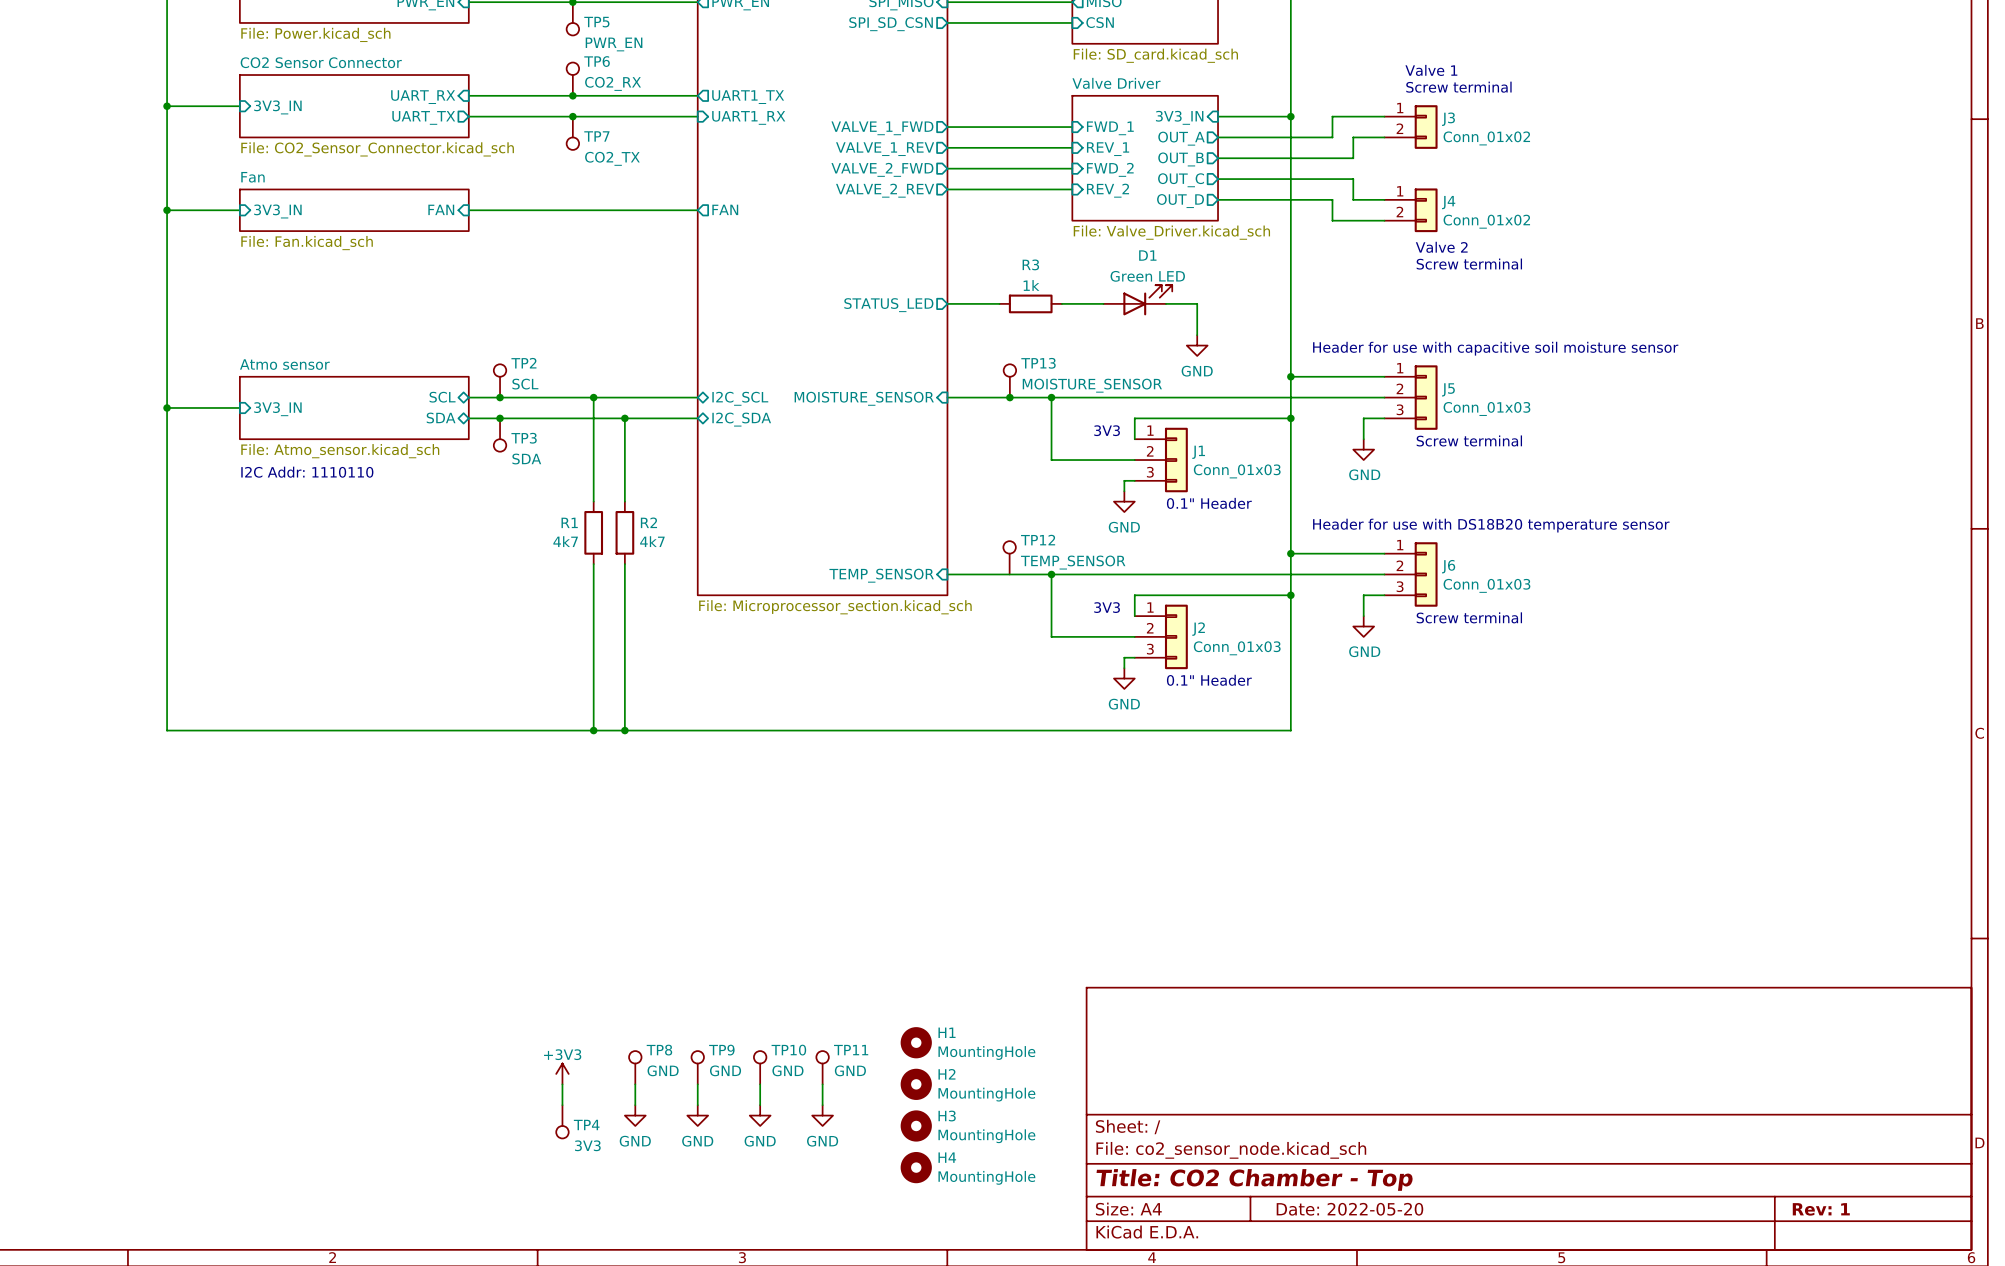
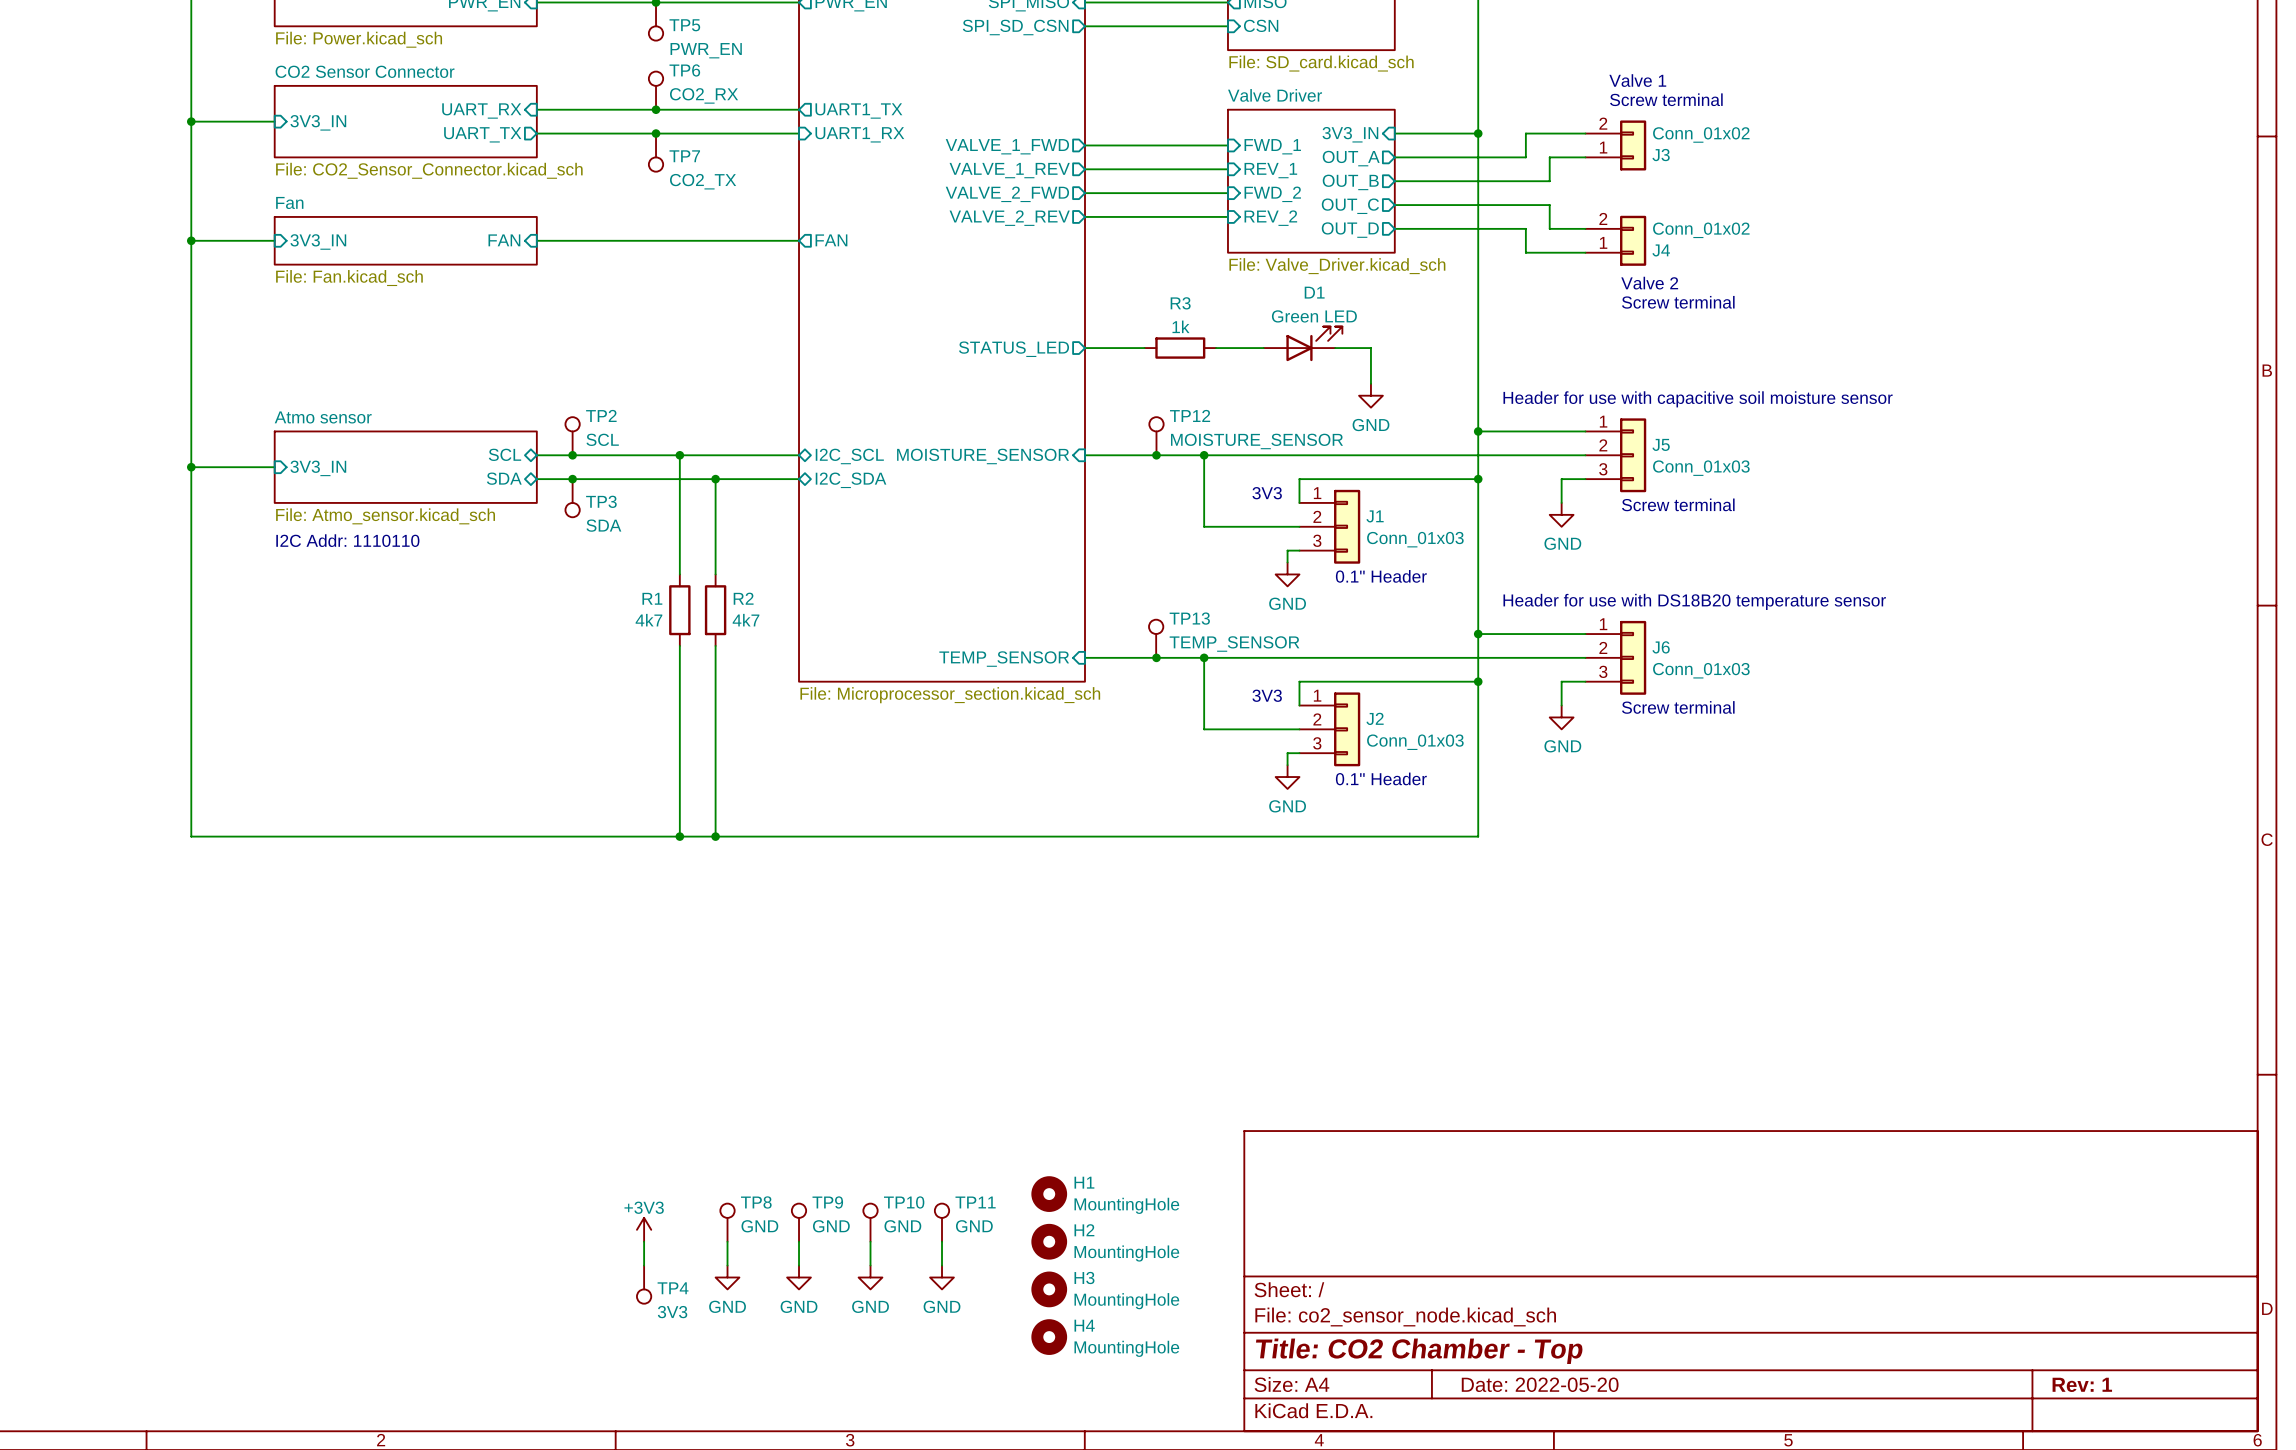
J3 flip: as is (1426, 127) -> up-down (1633, 145)
J4 flip: as is (1426, 210) -> up-down (1633, 240)
TP13 name: TP13 (1038, 363) -> TP12 (1190, 415)
TP12 name: TP12 (1038, 540) -> TP13 (1189, 618)
junction: none -> (1156, 657)

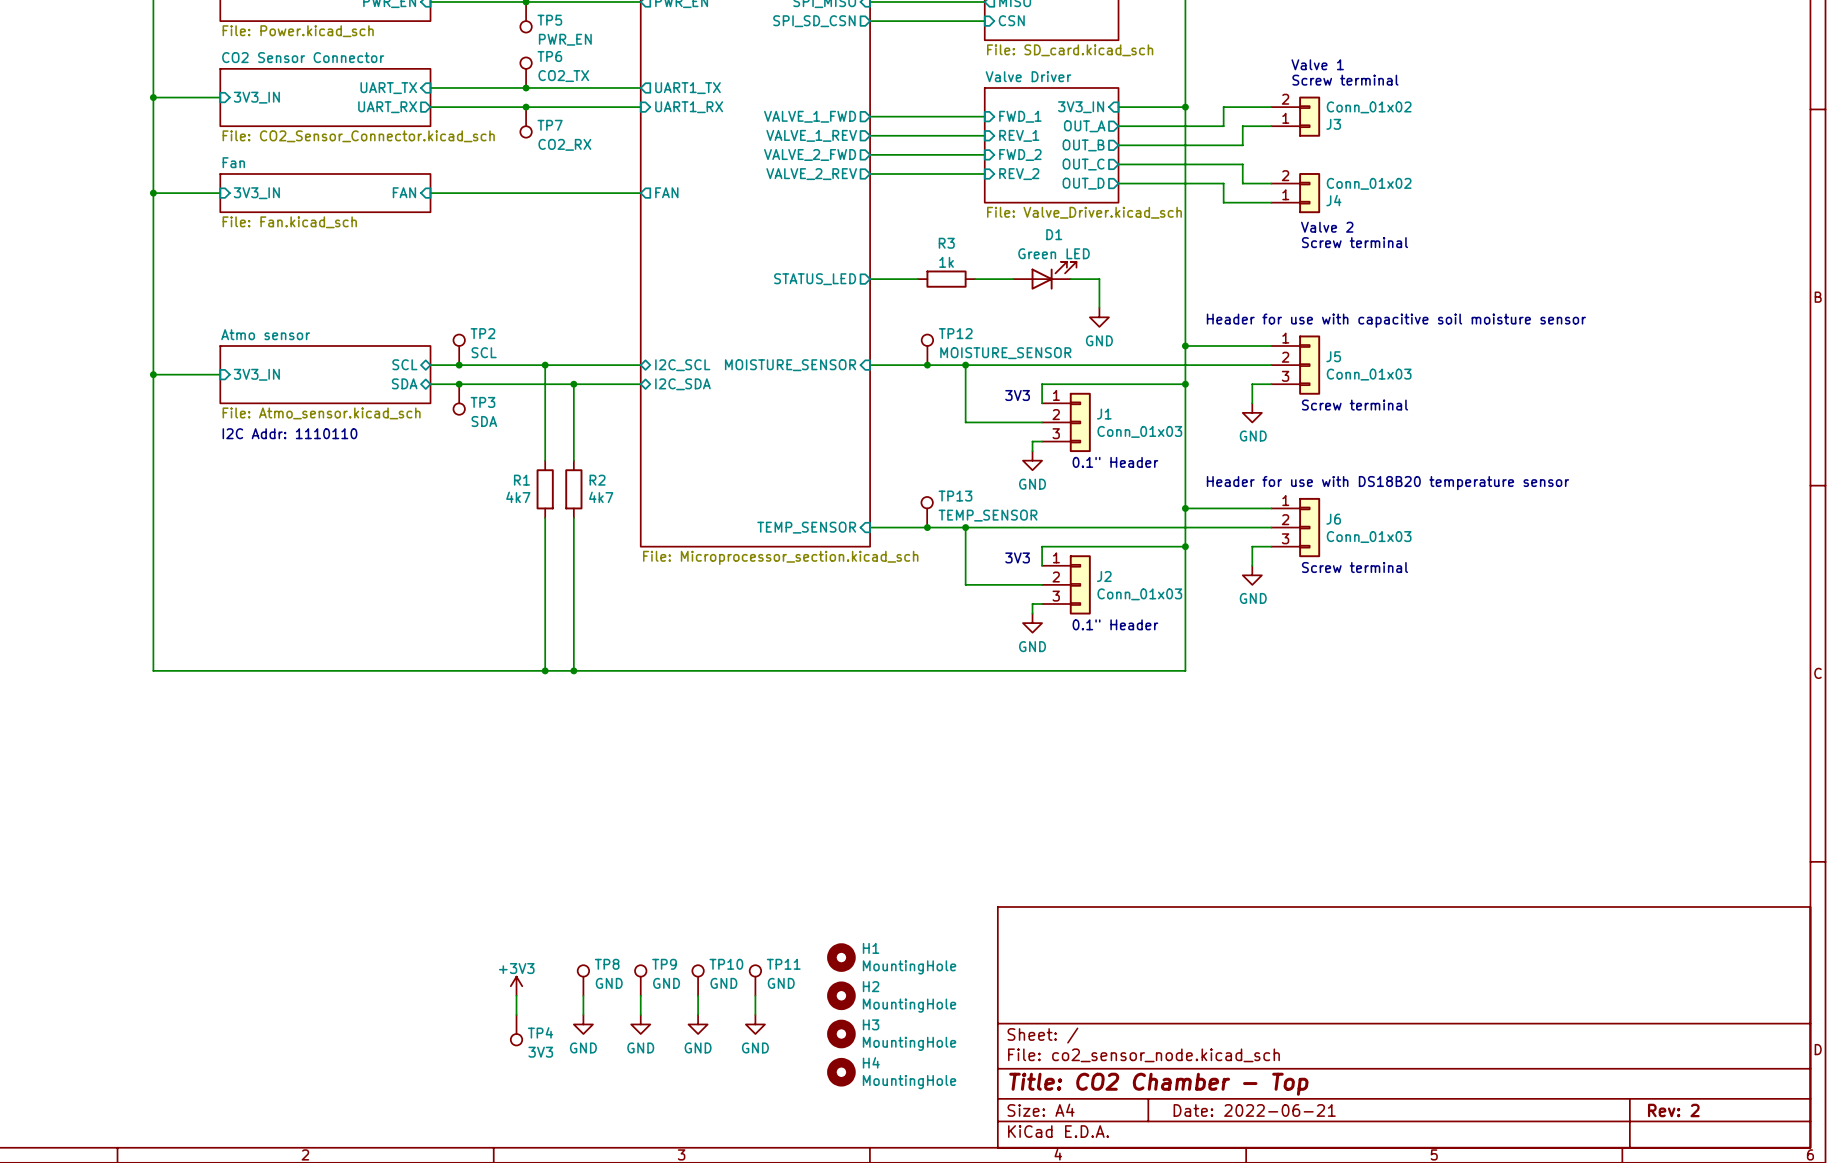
TP6 value: CO2_RX (704, 95) -> CO2_TX (563, 76)
sheet pin: UART_RX (481, 111) -> UART_TX (388, 88)
sheet pin: UART_TX (482, 134) -> UART_RX (387, 107)
TP7 value: CO2_TX (703, 181) -> CO2_RX (564, 144)
title block: Date: 2022-05-20 (1540, 1384) -> Date: 2022-06-21 (1254, 1110)
title block: Rev: 1 (2082, 1384) -> Rev: 2 (1673, 1110)

